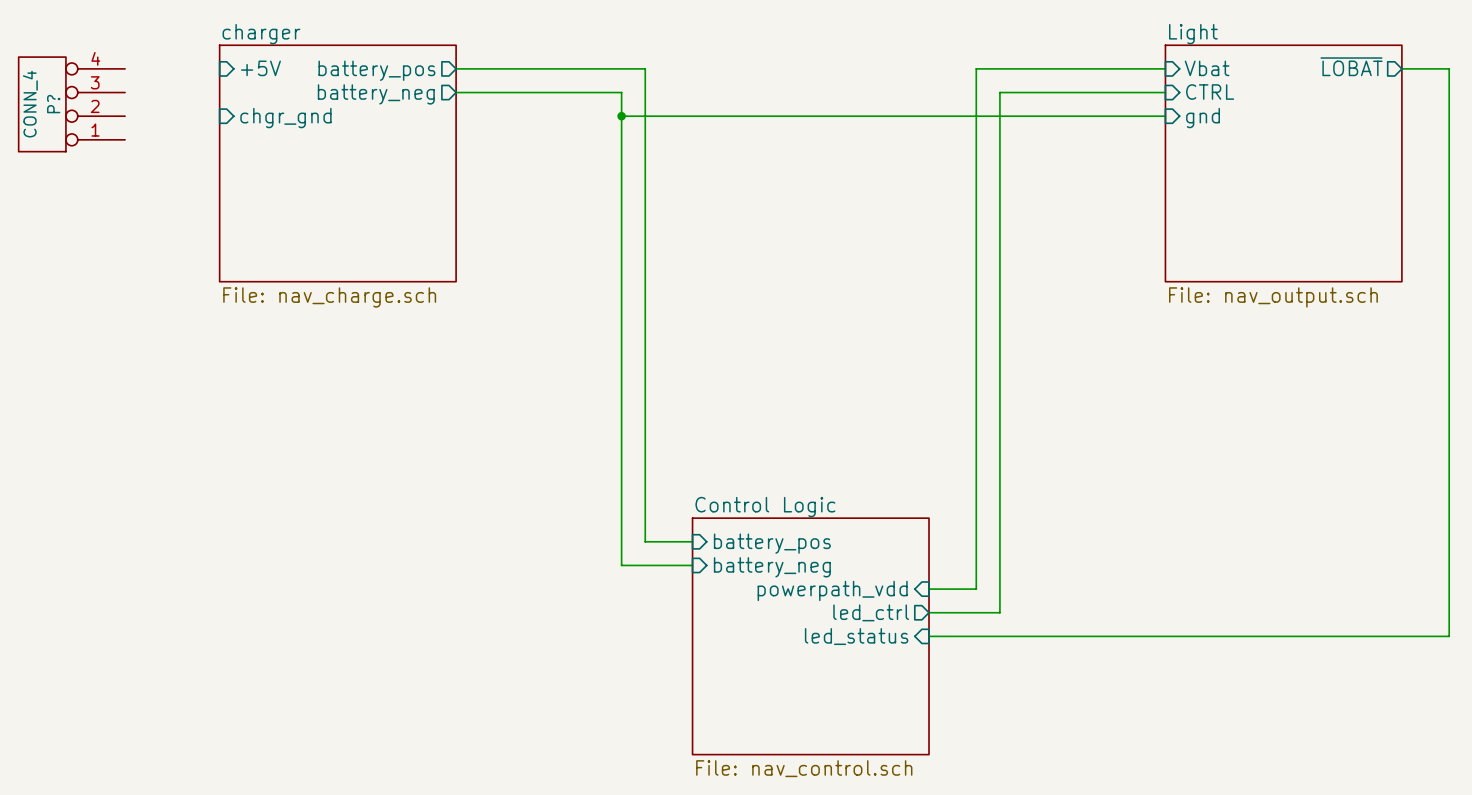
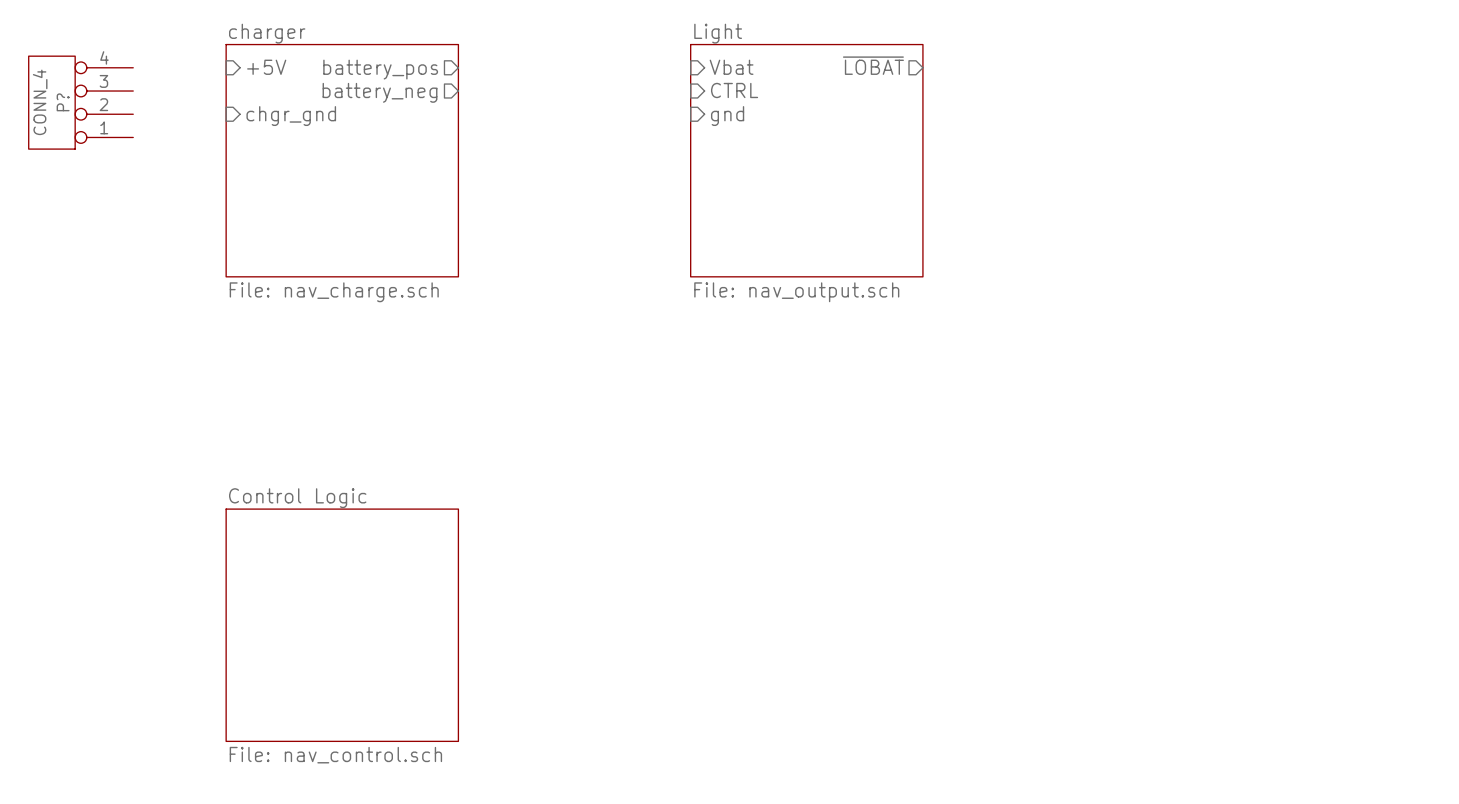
sheet pin: none -> ~{LOBAT} (873, 65)
sheet pin: ~{LOBAT} (1351, 66) -> none
wire: (456, 68) (645, 68) (645, 541) (692, 541) -> none
sheet pin: none -> Vbat (731, 67)
wire: (1165, 68) (976, 68) (976, 589) (928, 589) -> none
sheet pin: Vbat (1207, 68) -> none
wire: (1401, 68) (1449, 68) (1449, 636) (928, 636) -> none
wire: (456, 92) (621, 92) (621, 565) (692, 565) -> none
sheet pin: none -> CTRL (734, 90)
wire: (1165, 92) (999, 92) (999, 612) (928, 612) -> none
sheet pin: CTRL (1210, 92) -> none
wire: (621, 116) (1165, 116) -> none
junction: (621, 116) -> none
sheet pin: none -> gnd (727, 116)
sheet pin: gnd (1203, 118) -> none
sheet Light: none -> File: nav_output.sch (806, 160)
sheet Light: File: nav_output.sch (1283, 163) -> none
sheet pin: battery_pos (772, 543) -> none
sheet pin: battery_neg (772, 567) -> none
sheet pin: powerpath_vdd (832, 590) -> none
sheet pin: led_ctrl (871, 612) -> none
sheet Control Logic: none -> File: nav_control.sch (342, 625)
sheet Control Logic: File: nav_control.sch (810, 636) -> none
sheet pin: led_status (856, 636) -> none

